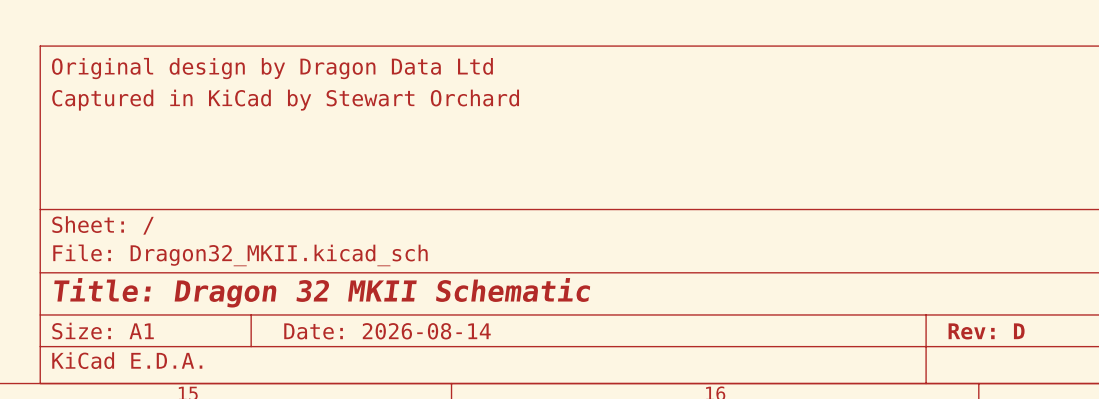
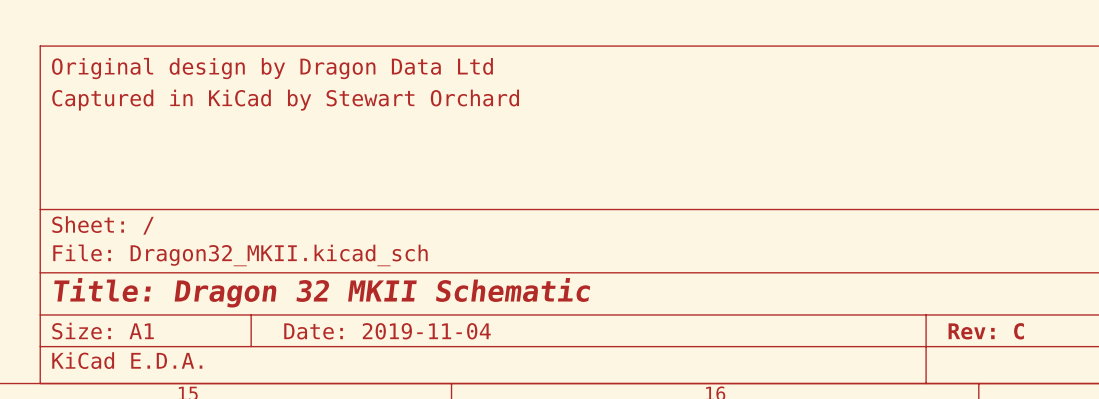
title block: Date: 2026-08-14 (387, 331) -> Date: 2019-11-04 (387, 331)
title block: Rev: D (986, 331) -> Rev: C (986, 331)

